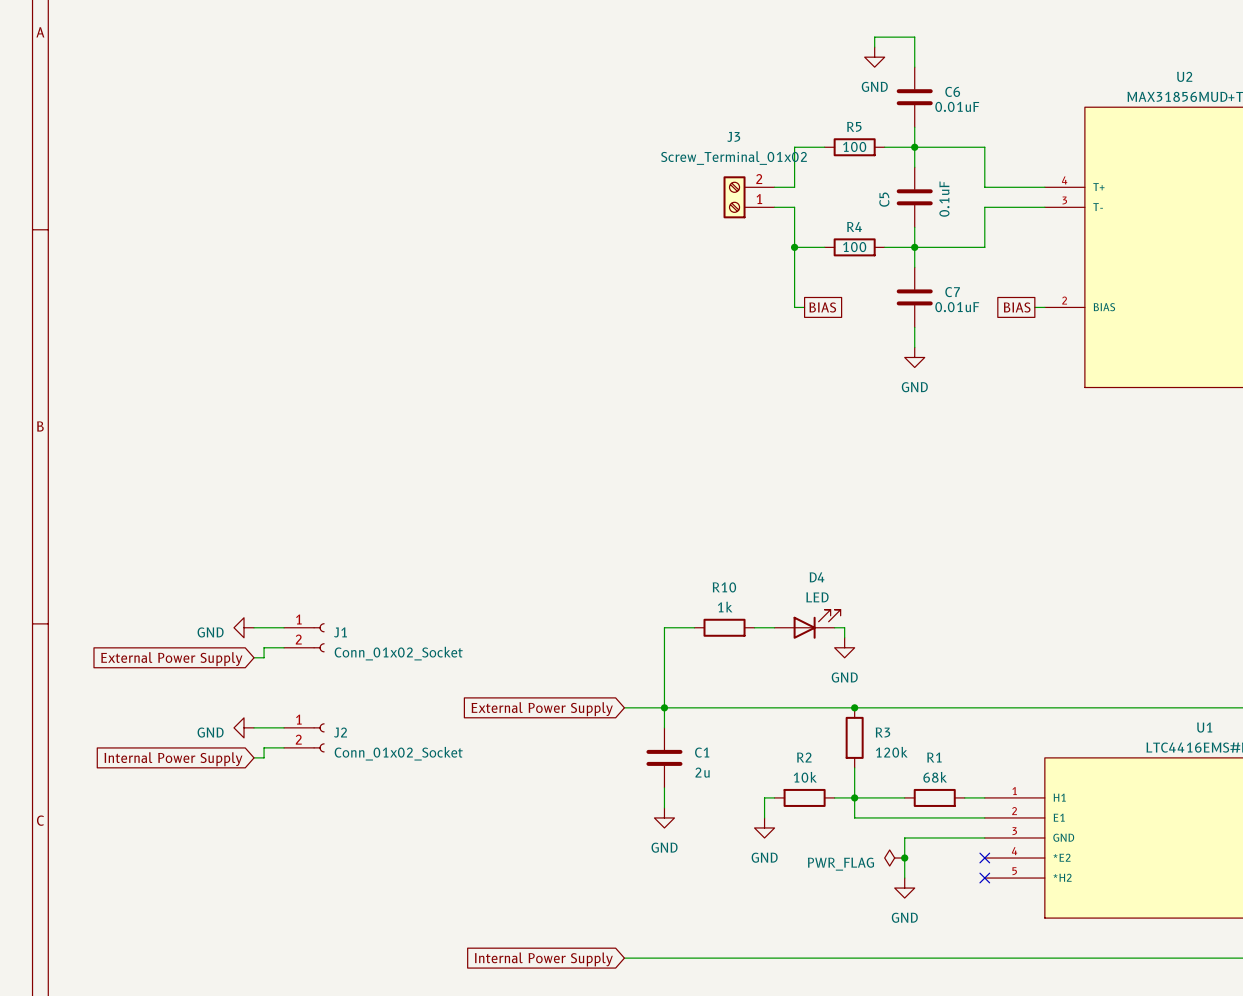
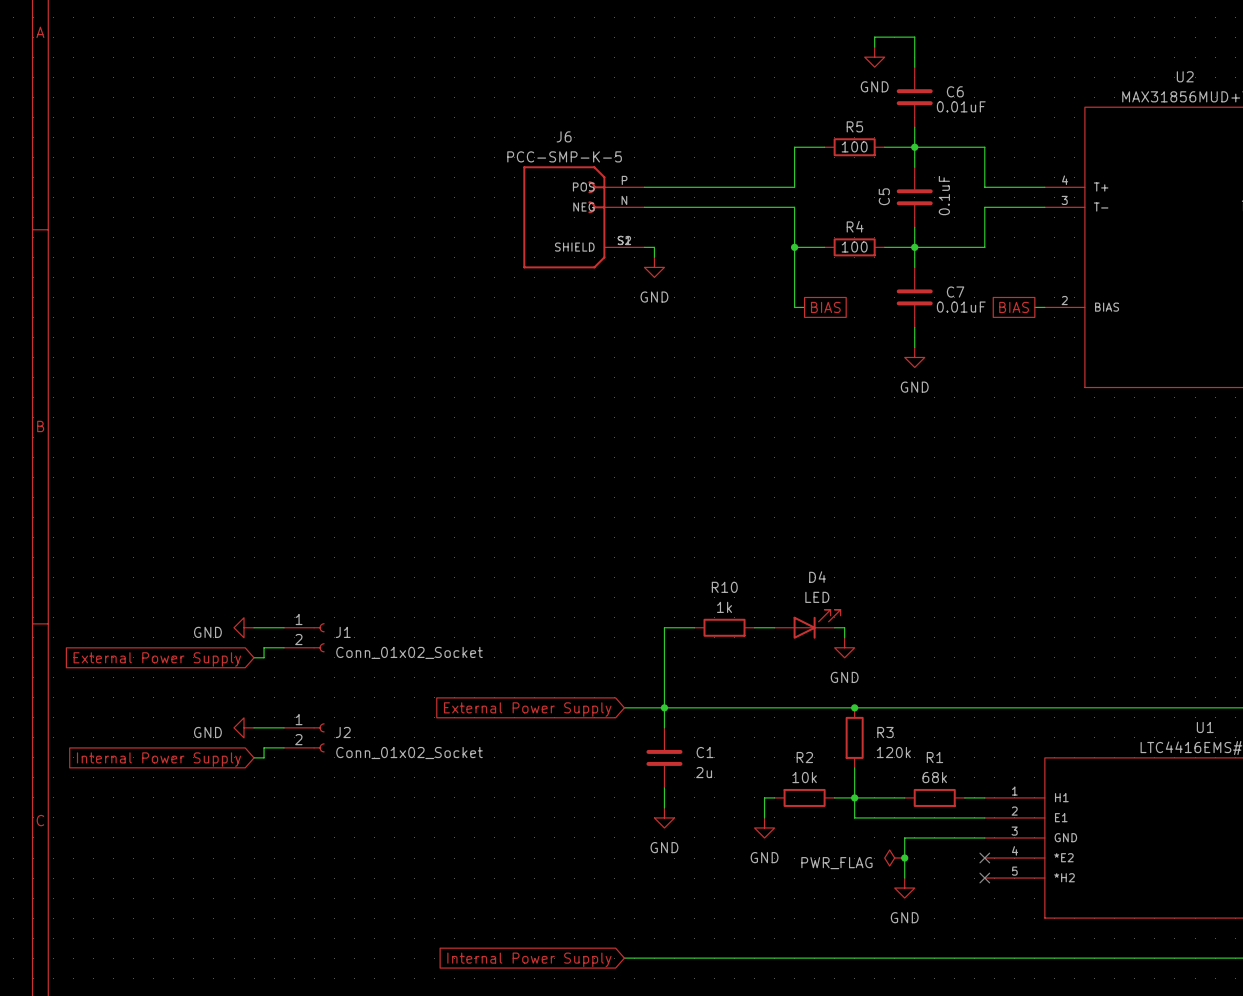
wire: none -> (644, 187) (774, 187)
J3: Screw_Terminal_01x02 (749, 197) -> none
wire: none -> (644, 207) (774, 207)
J6: none -> PCC-SMP-K-5 (583, 217)
wire: none -> (644, 247) (654, 247) (654, 257)
power symbol: none -> GND (654, 267)

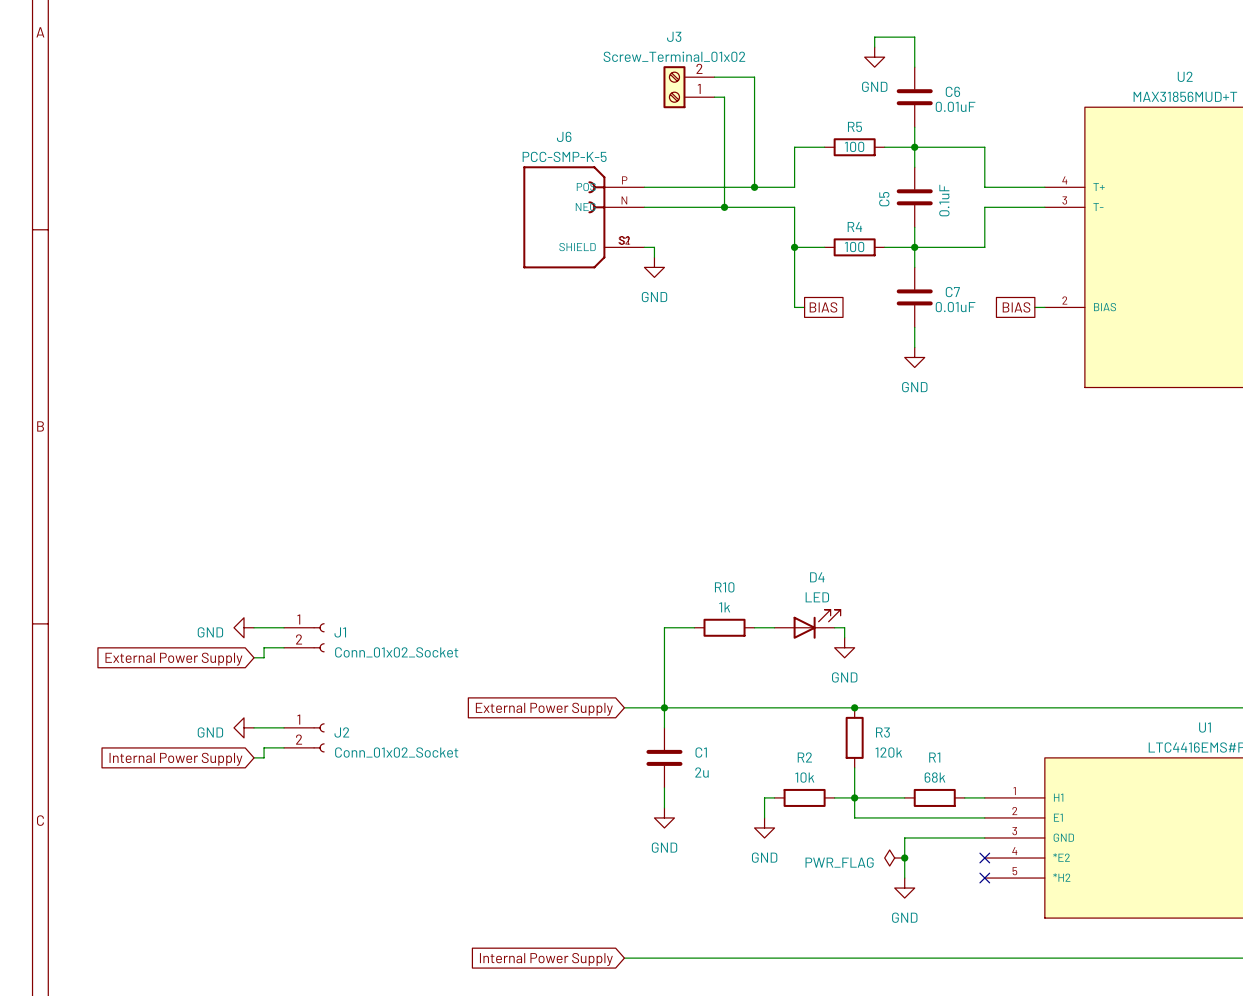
wire: none -> (714, 77) (754, 77) (754, 187)
J3: none -> Screw_Terminal_01x02 (688, 87)
wire: none -> (714, 97) (724, 97) (724, 207)
junction: none -> (754, 187)
junction: none -> (724, 207)

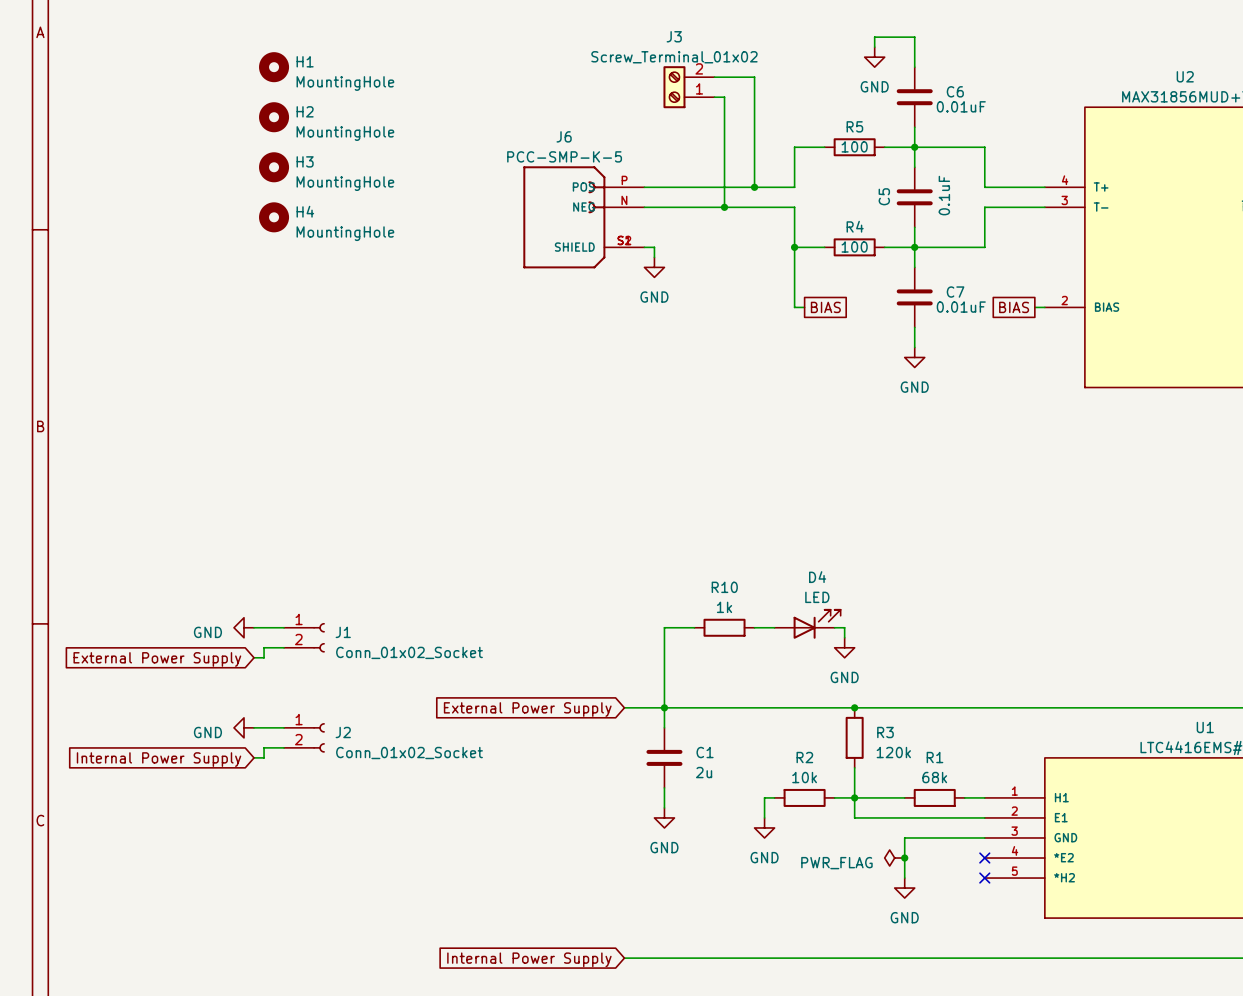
H1: none -> MountingHole (274, 67)
H2: none -> MountingHole (274, 117)
H3: none -> MountingHole (274, 167)
H4: none -> MountingHole (274, 217)

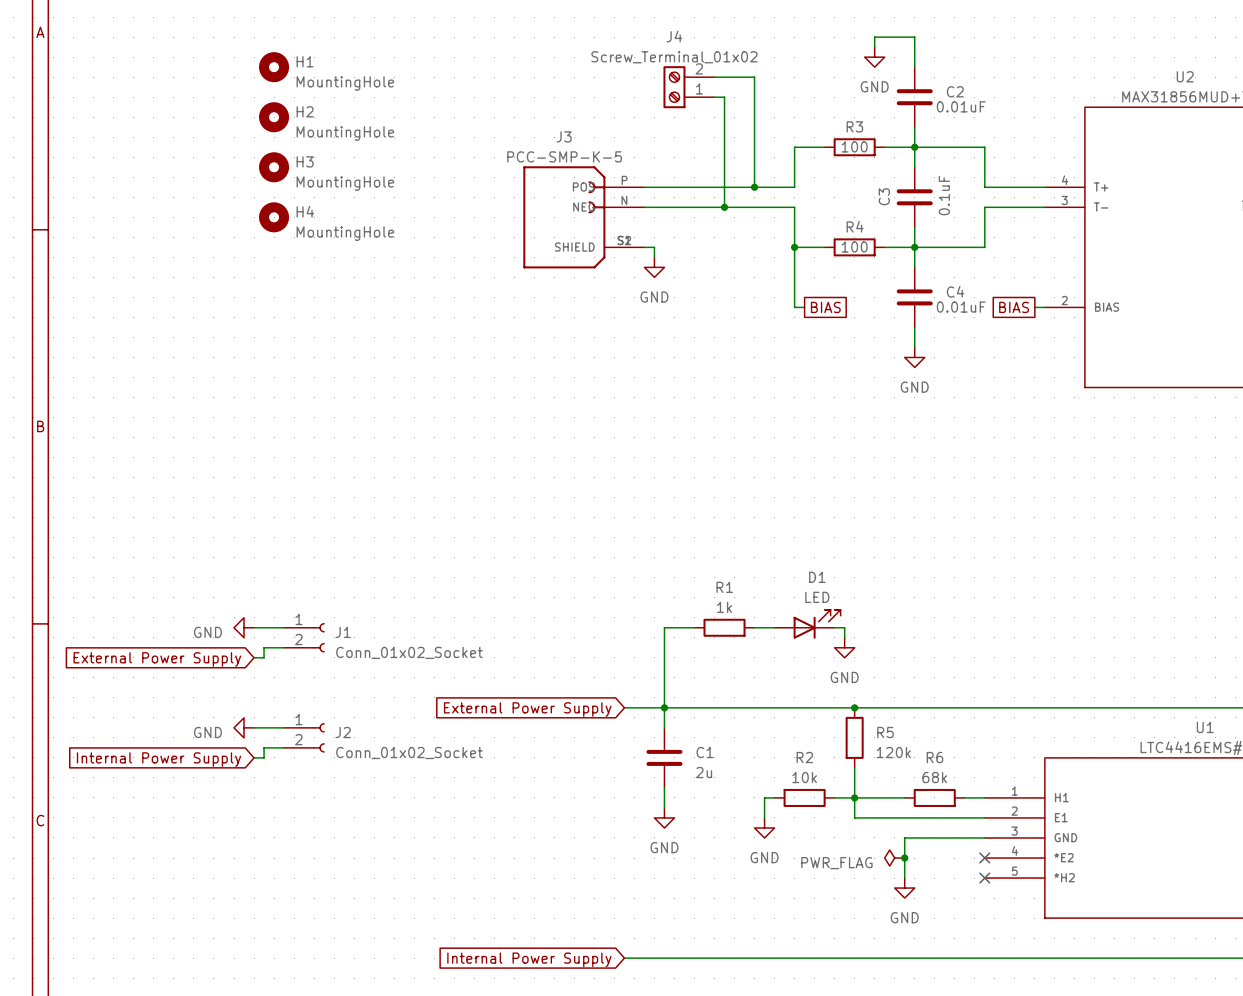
J3 name: J3 (674, 36) -> J4 (674, 36)
C6 name: C6 (955, 91) -> C2 (955, 91)
R5 name: R5 (854, 126) -> R3 (854, 126)
J6 name: J6 (564, 136) -> J3 (564, 136)
C5 name: C5 (884, 196) -> C3 (884, 196)
C7 name: C7 (955, 292) -> C4 (955, 291)
D4 name: D4 (817, 577) -> D1 (817, 577)
R10 name: R10 (724, 587) -> R1 (724, 587)
R3 name: R3 (885, 732) -> R5 (885, 732)
R1 name: R1 (934, 757) -> R6 (934, 757)

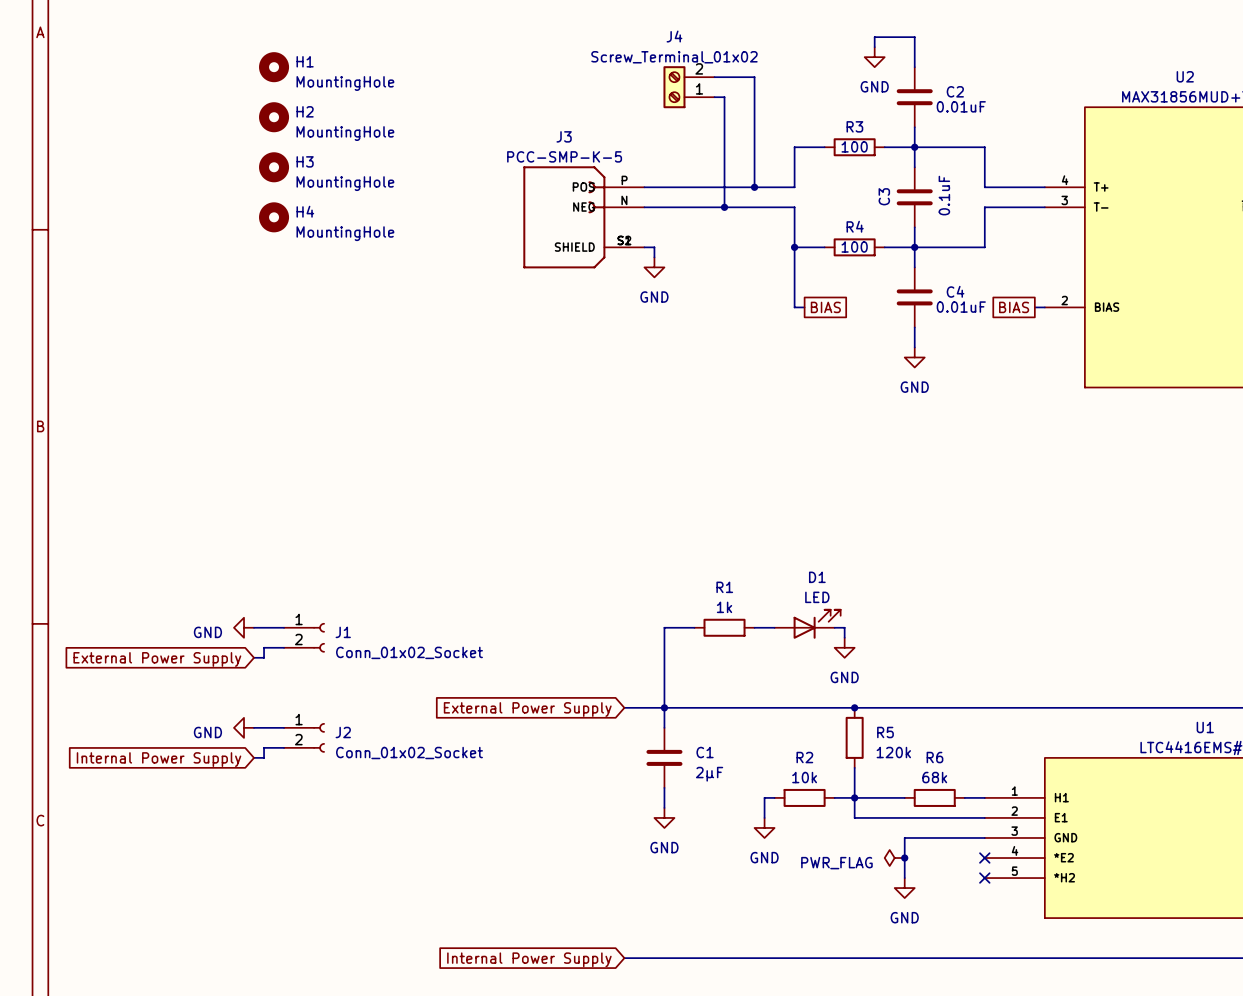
C1 value: 2u (704, 772) -> 2μF (709, 774)

